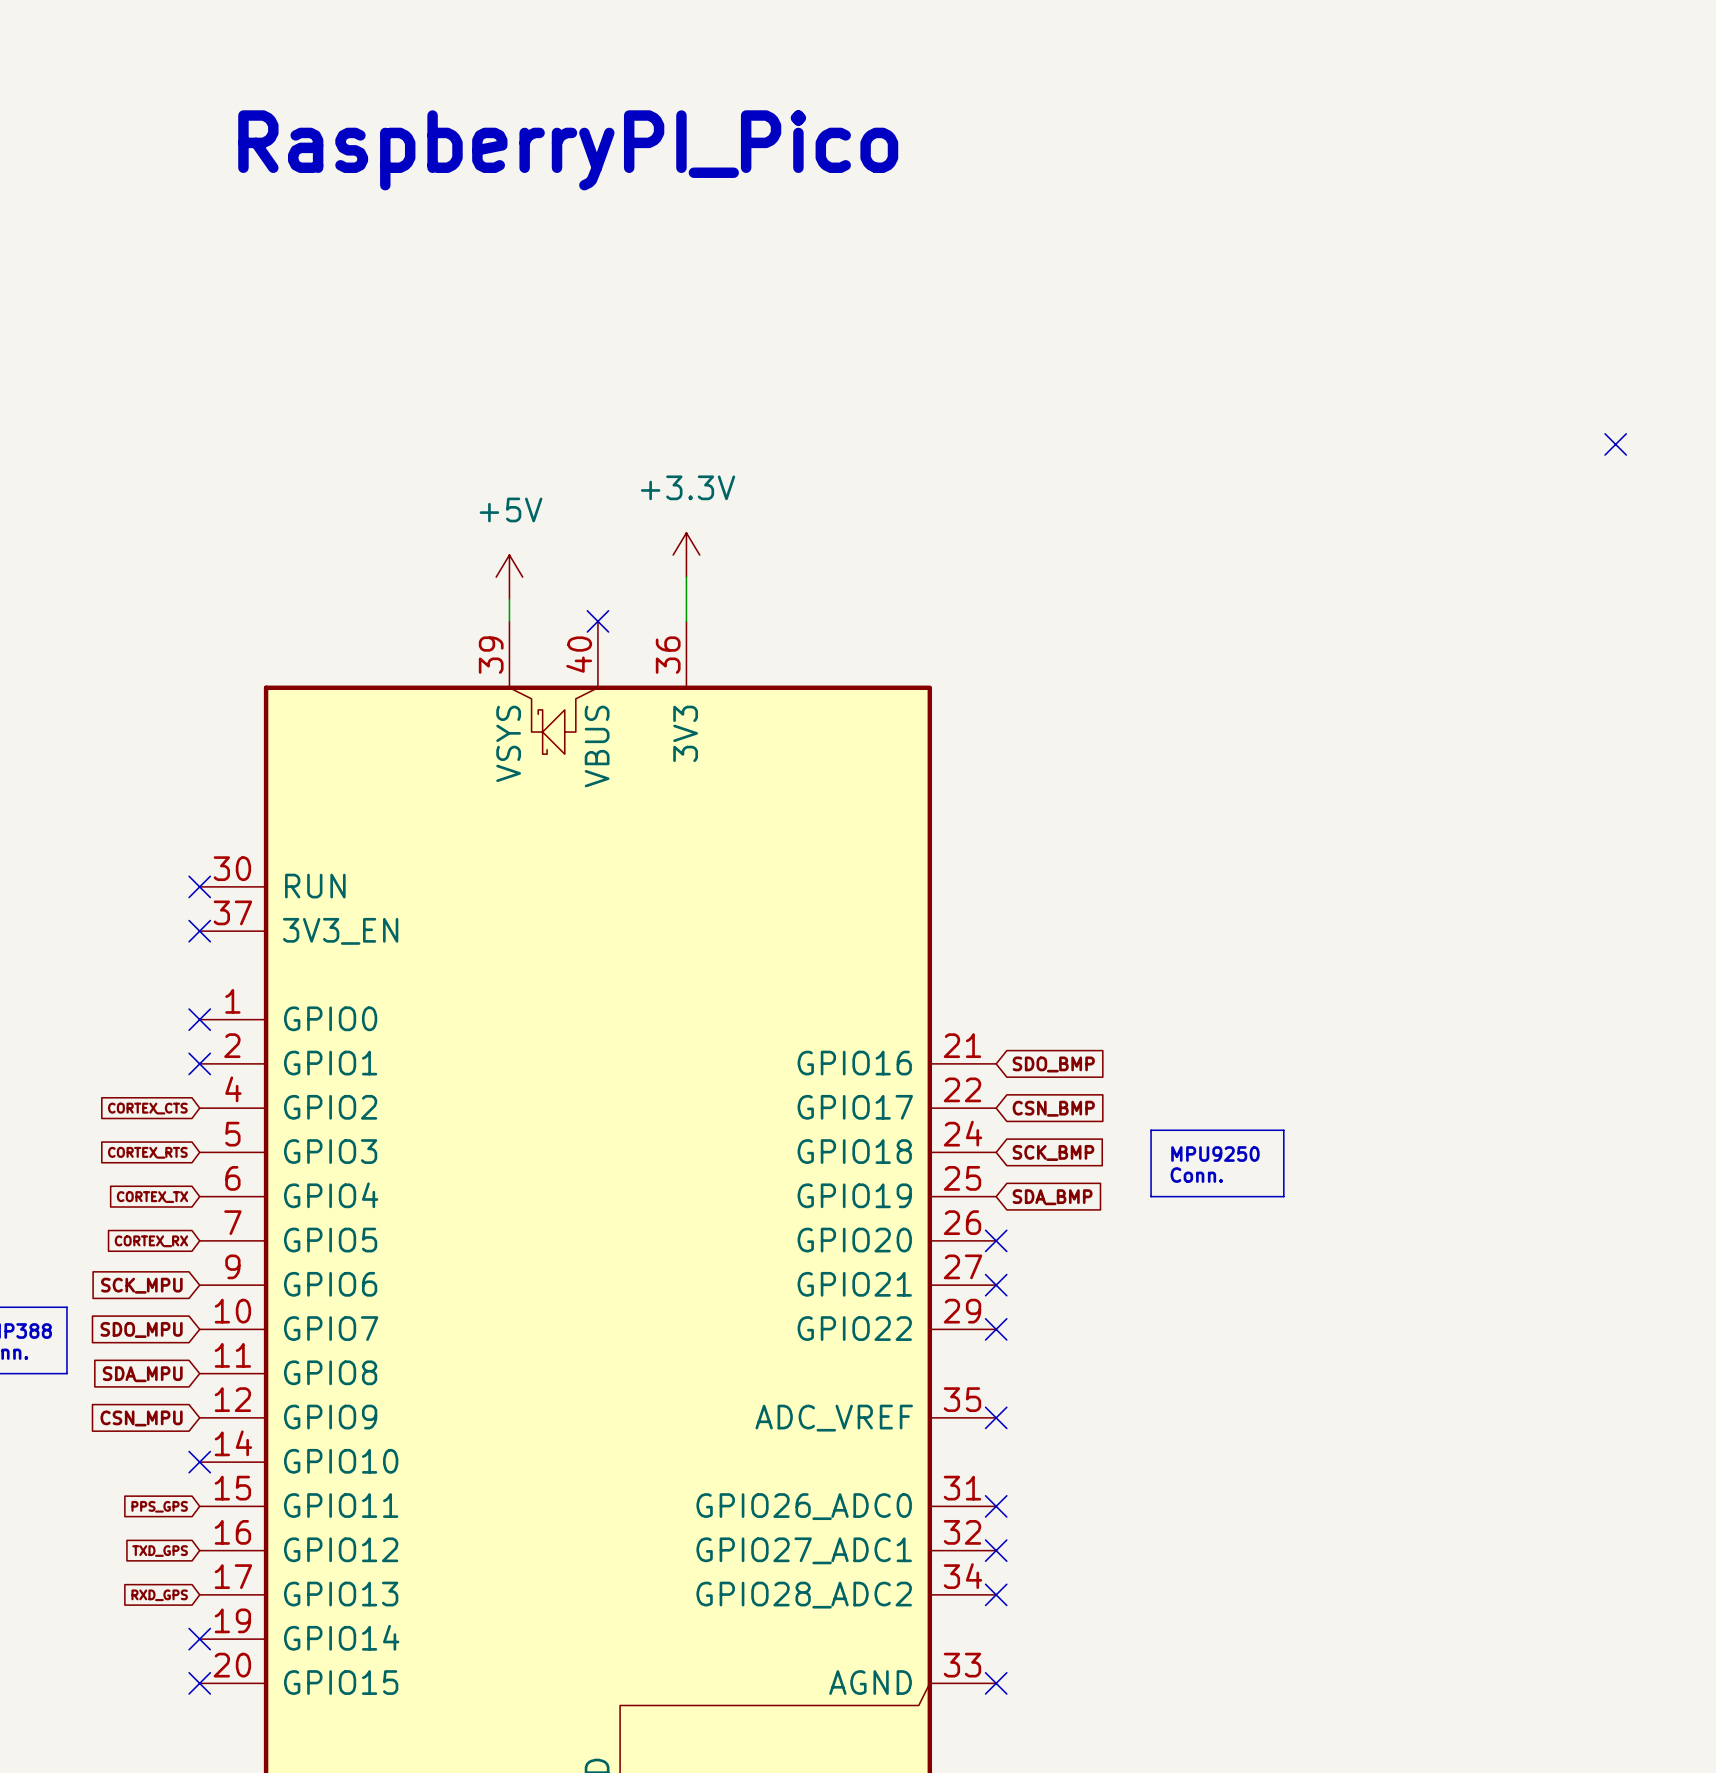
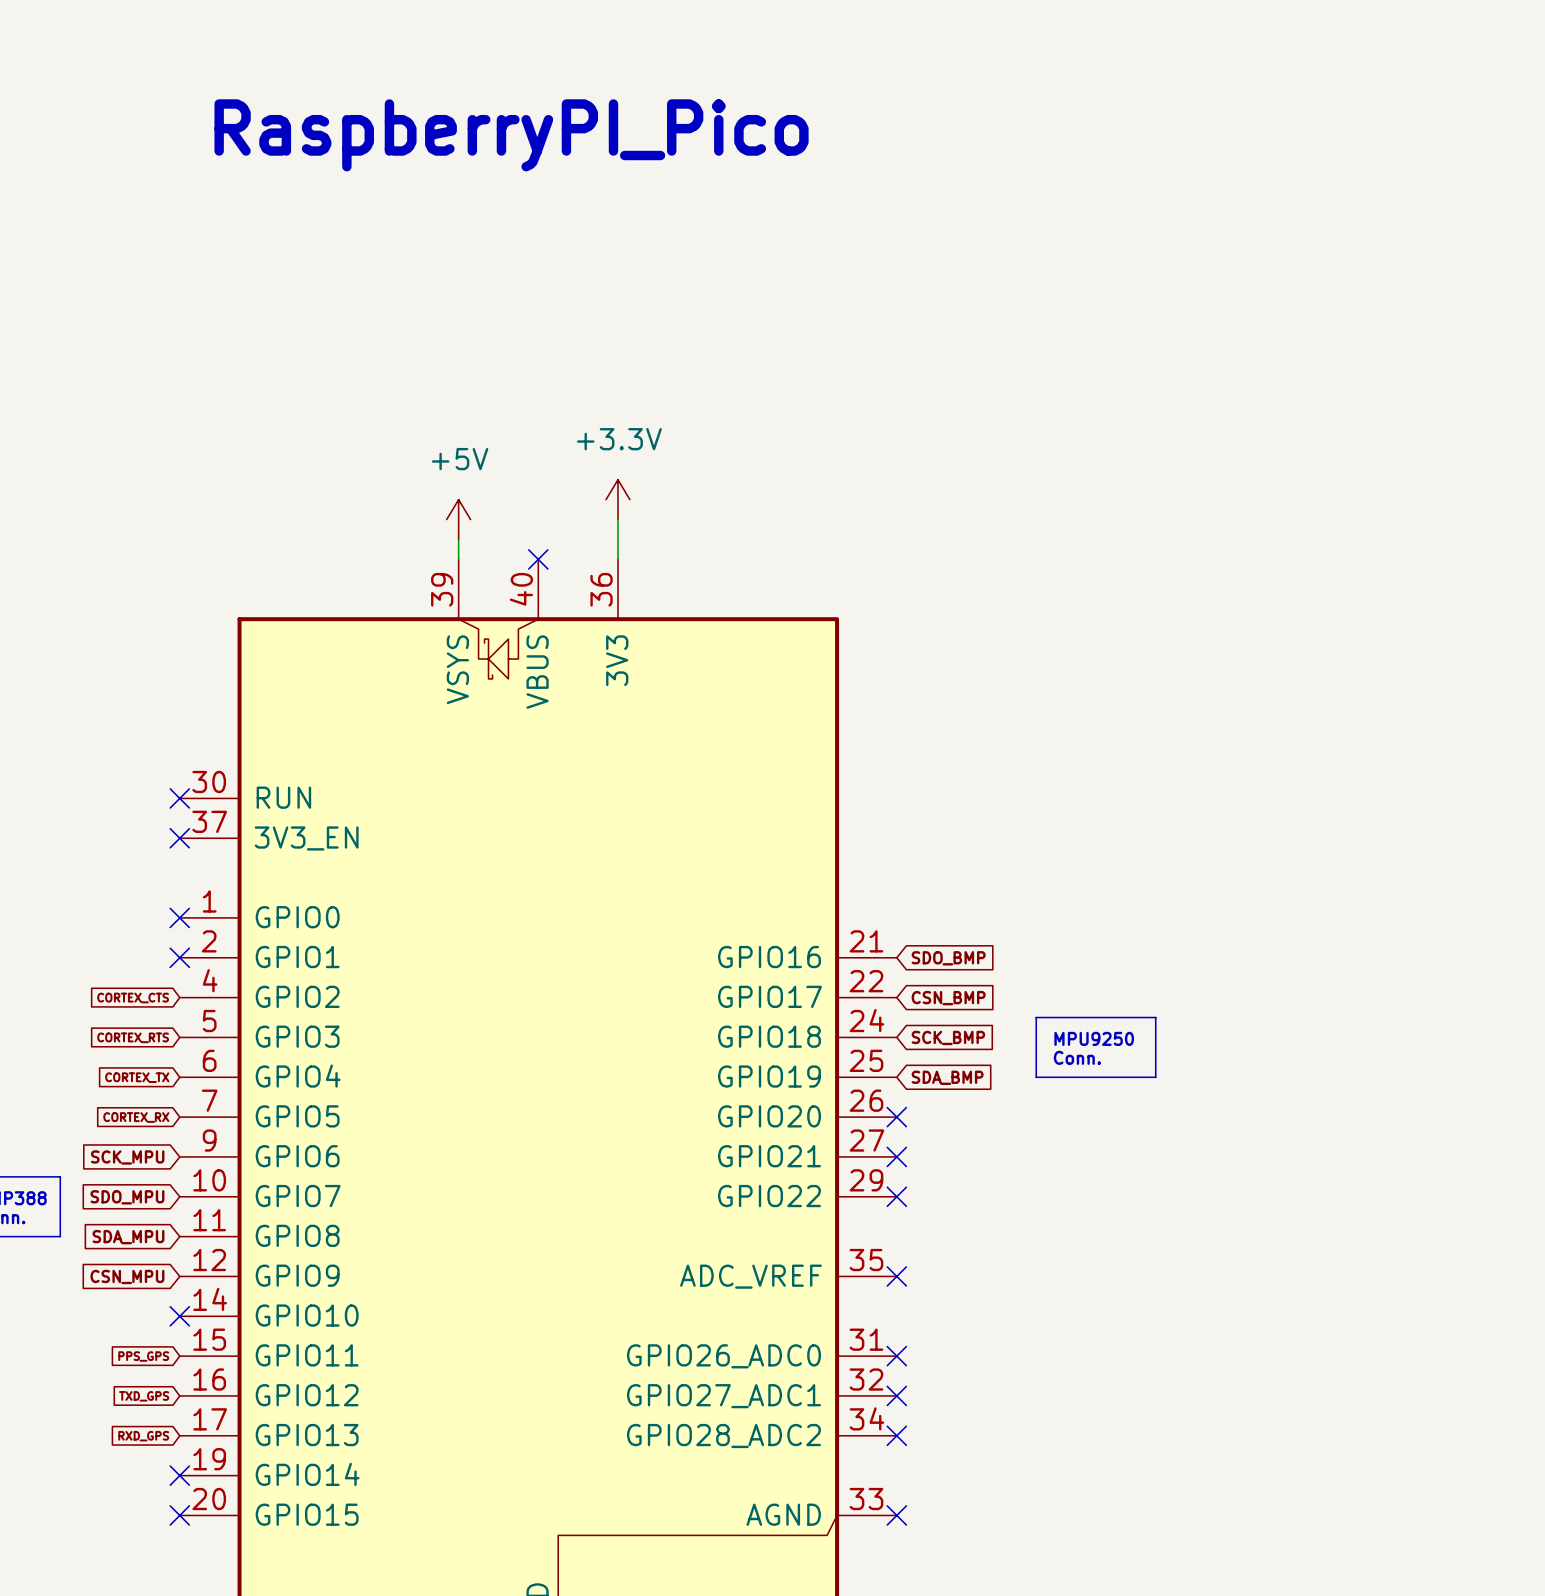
no-connect mark: (1615, 444) -> none

